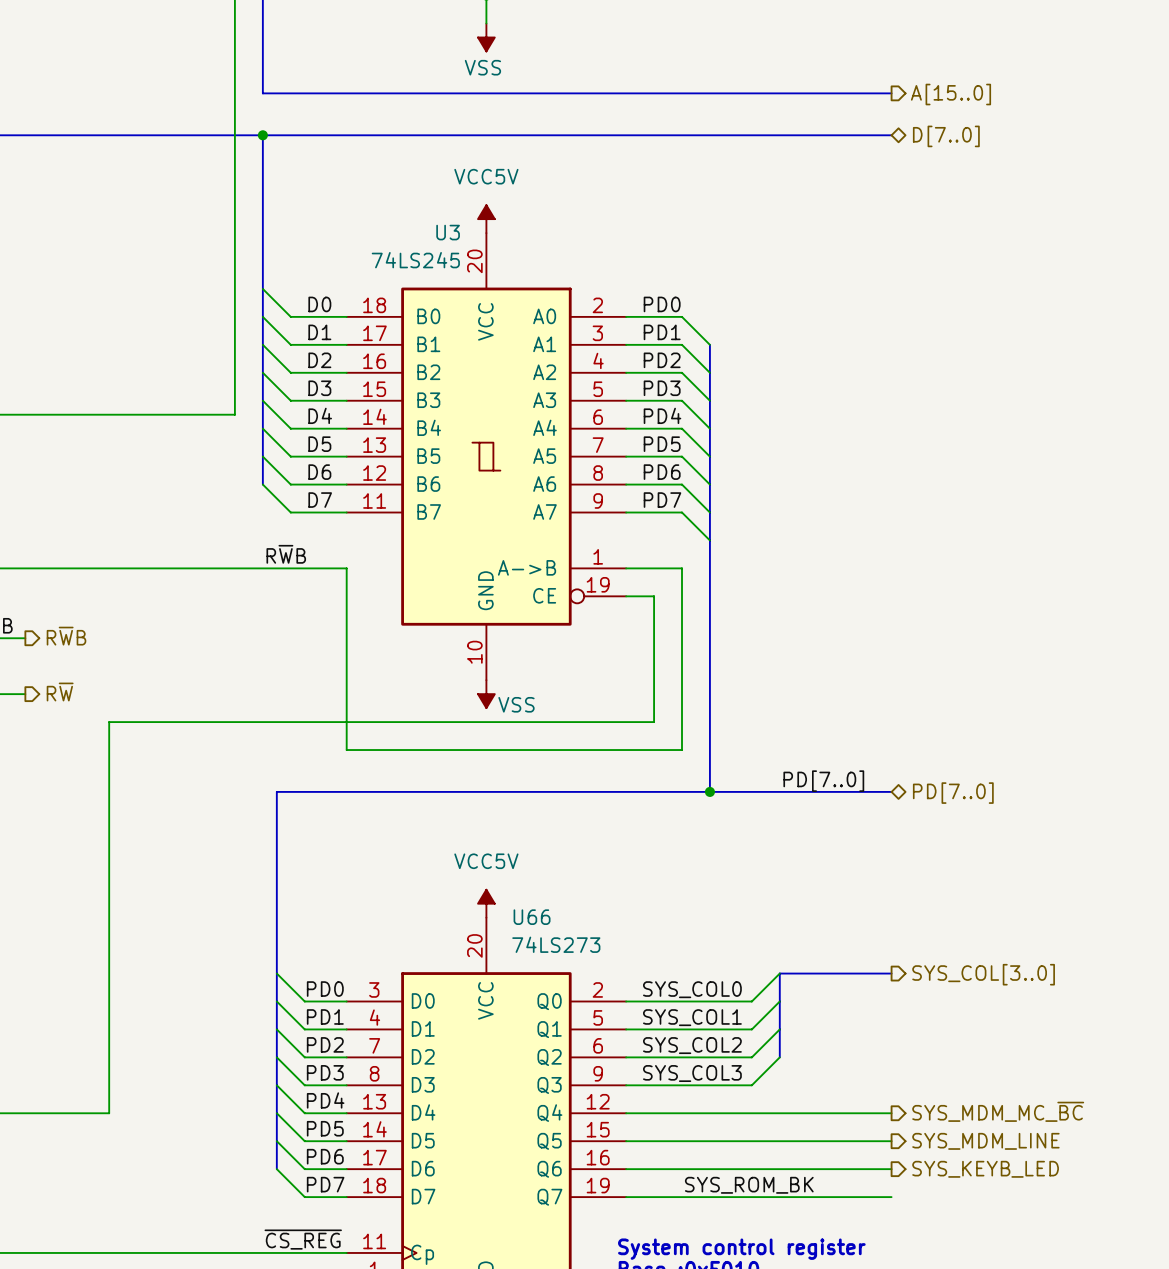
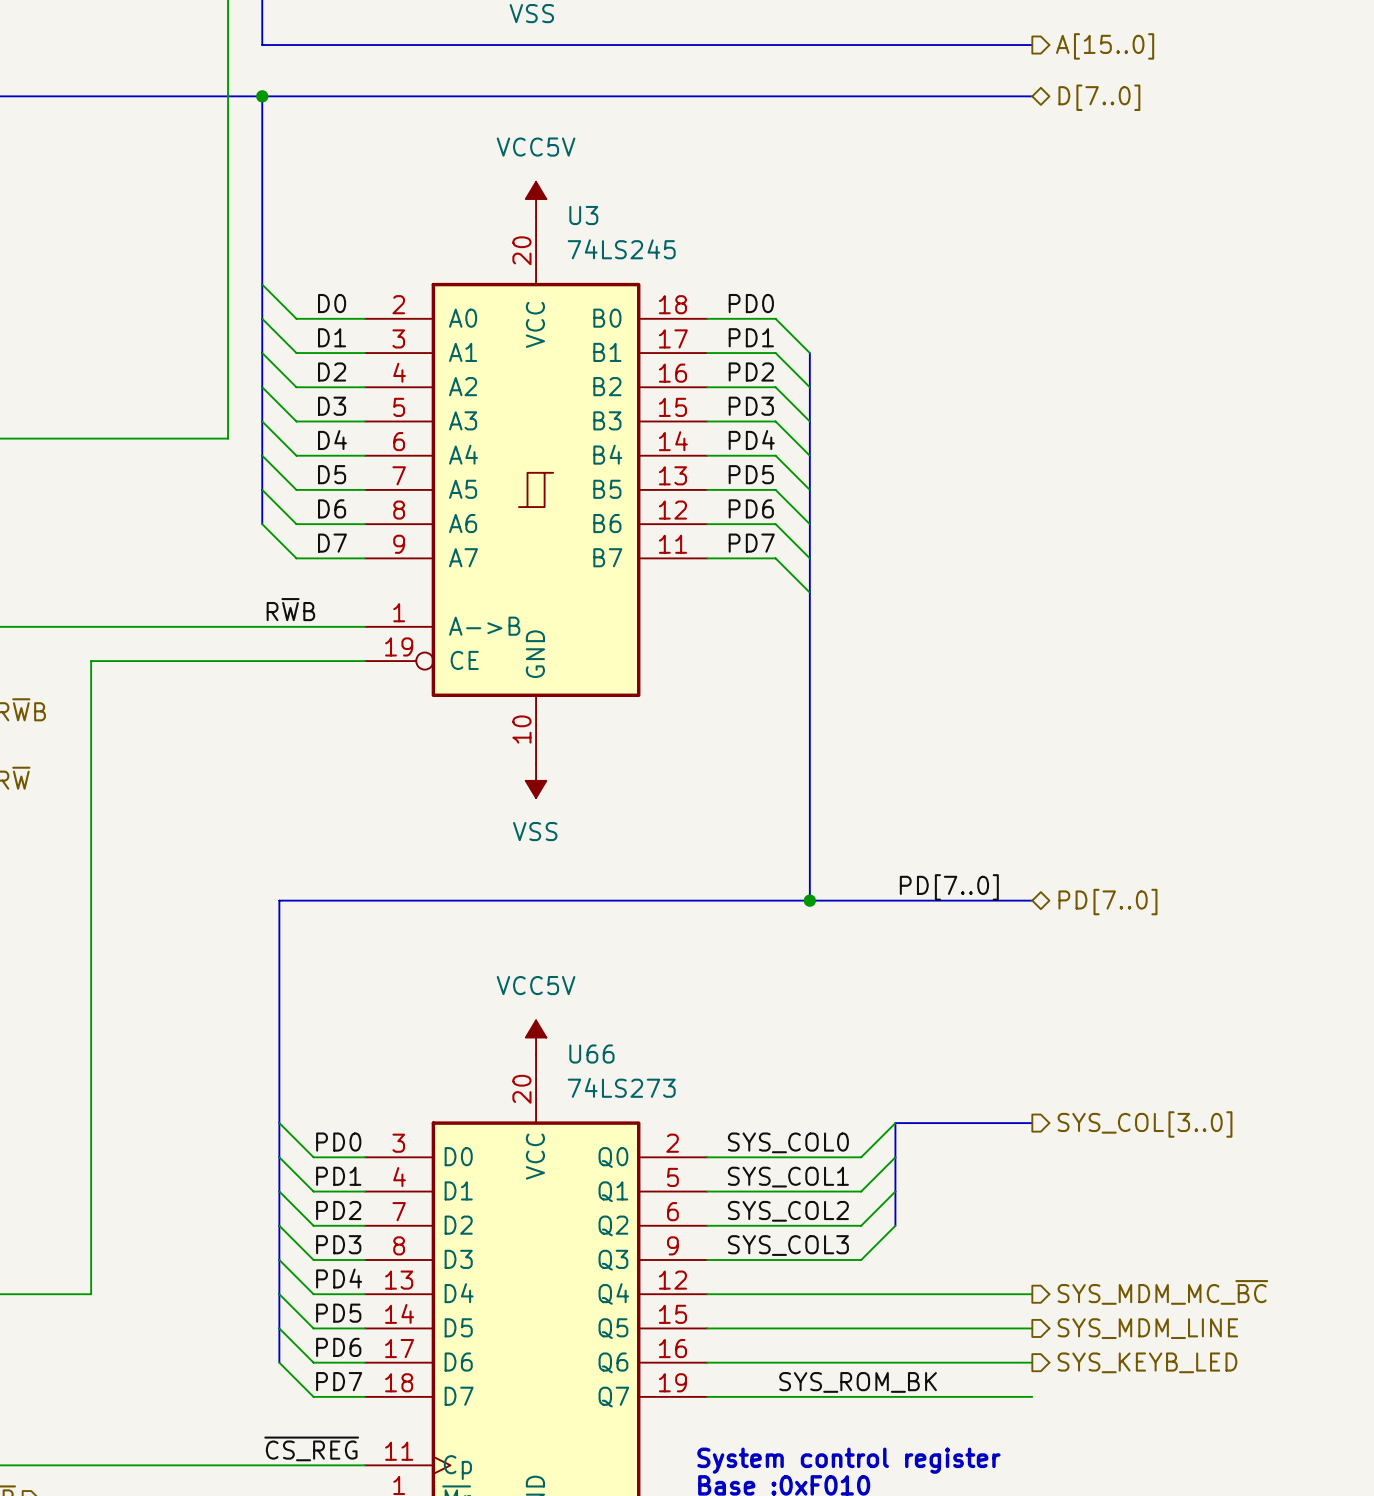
U3 flip: as is (486, 456) -> left-right (536, 489)
wire: (346, 568) (346, 750) (682, 750) (682, 568) (626, 568) -> none
wire: (626, 596) (654, 596) (654, 722) (109, 722) (109, 1113) -> (364, 661) (91, 661) (91, 1294) (74, 1294)
power symbol text position: VSS (516, 704) -> VSS (535, 831)

